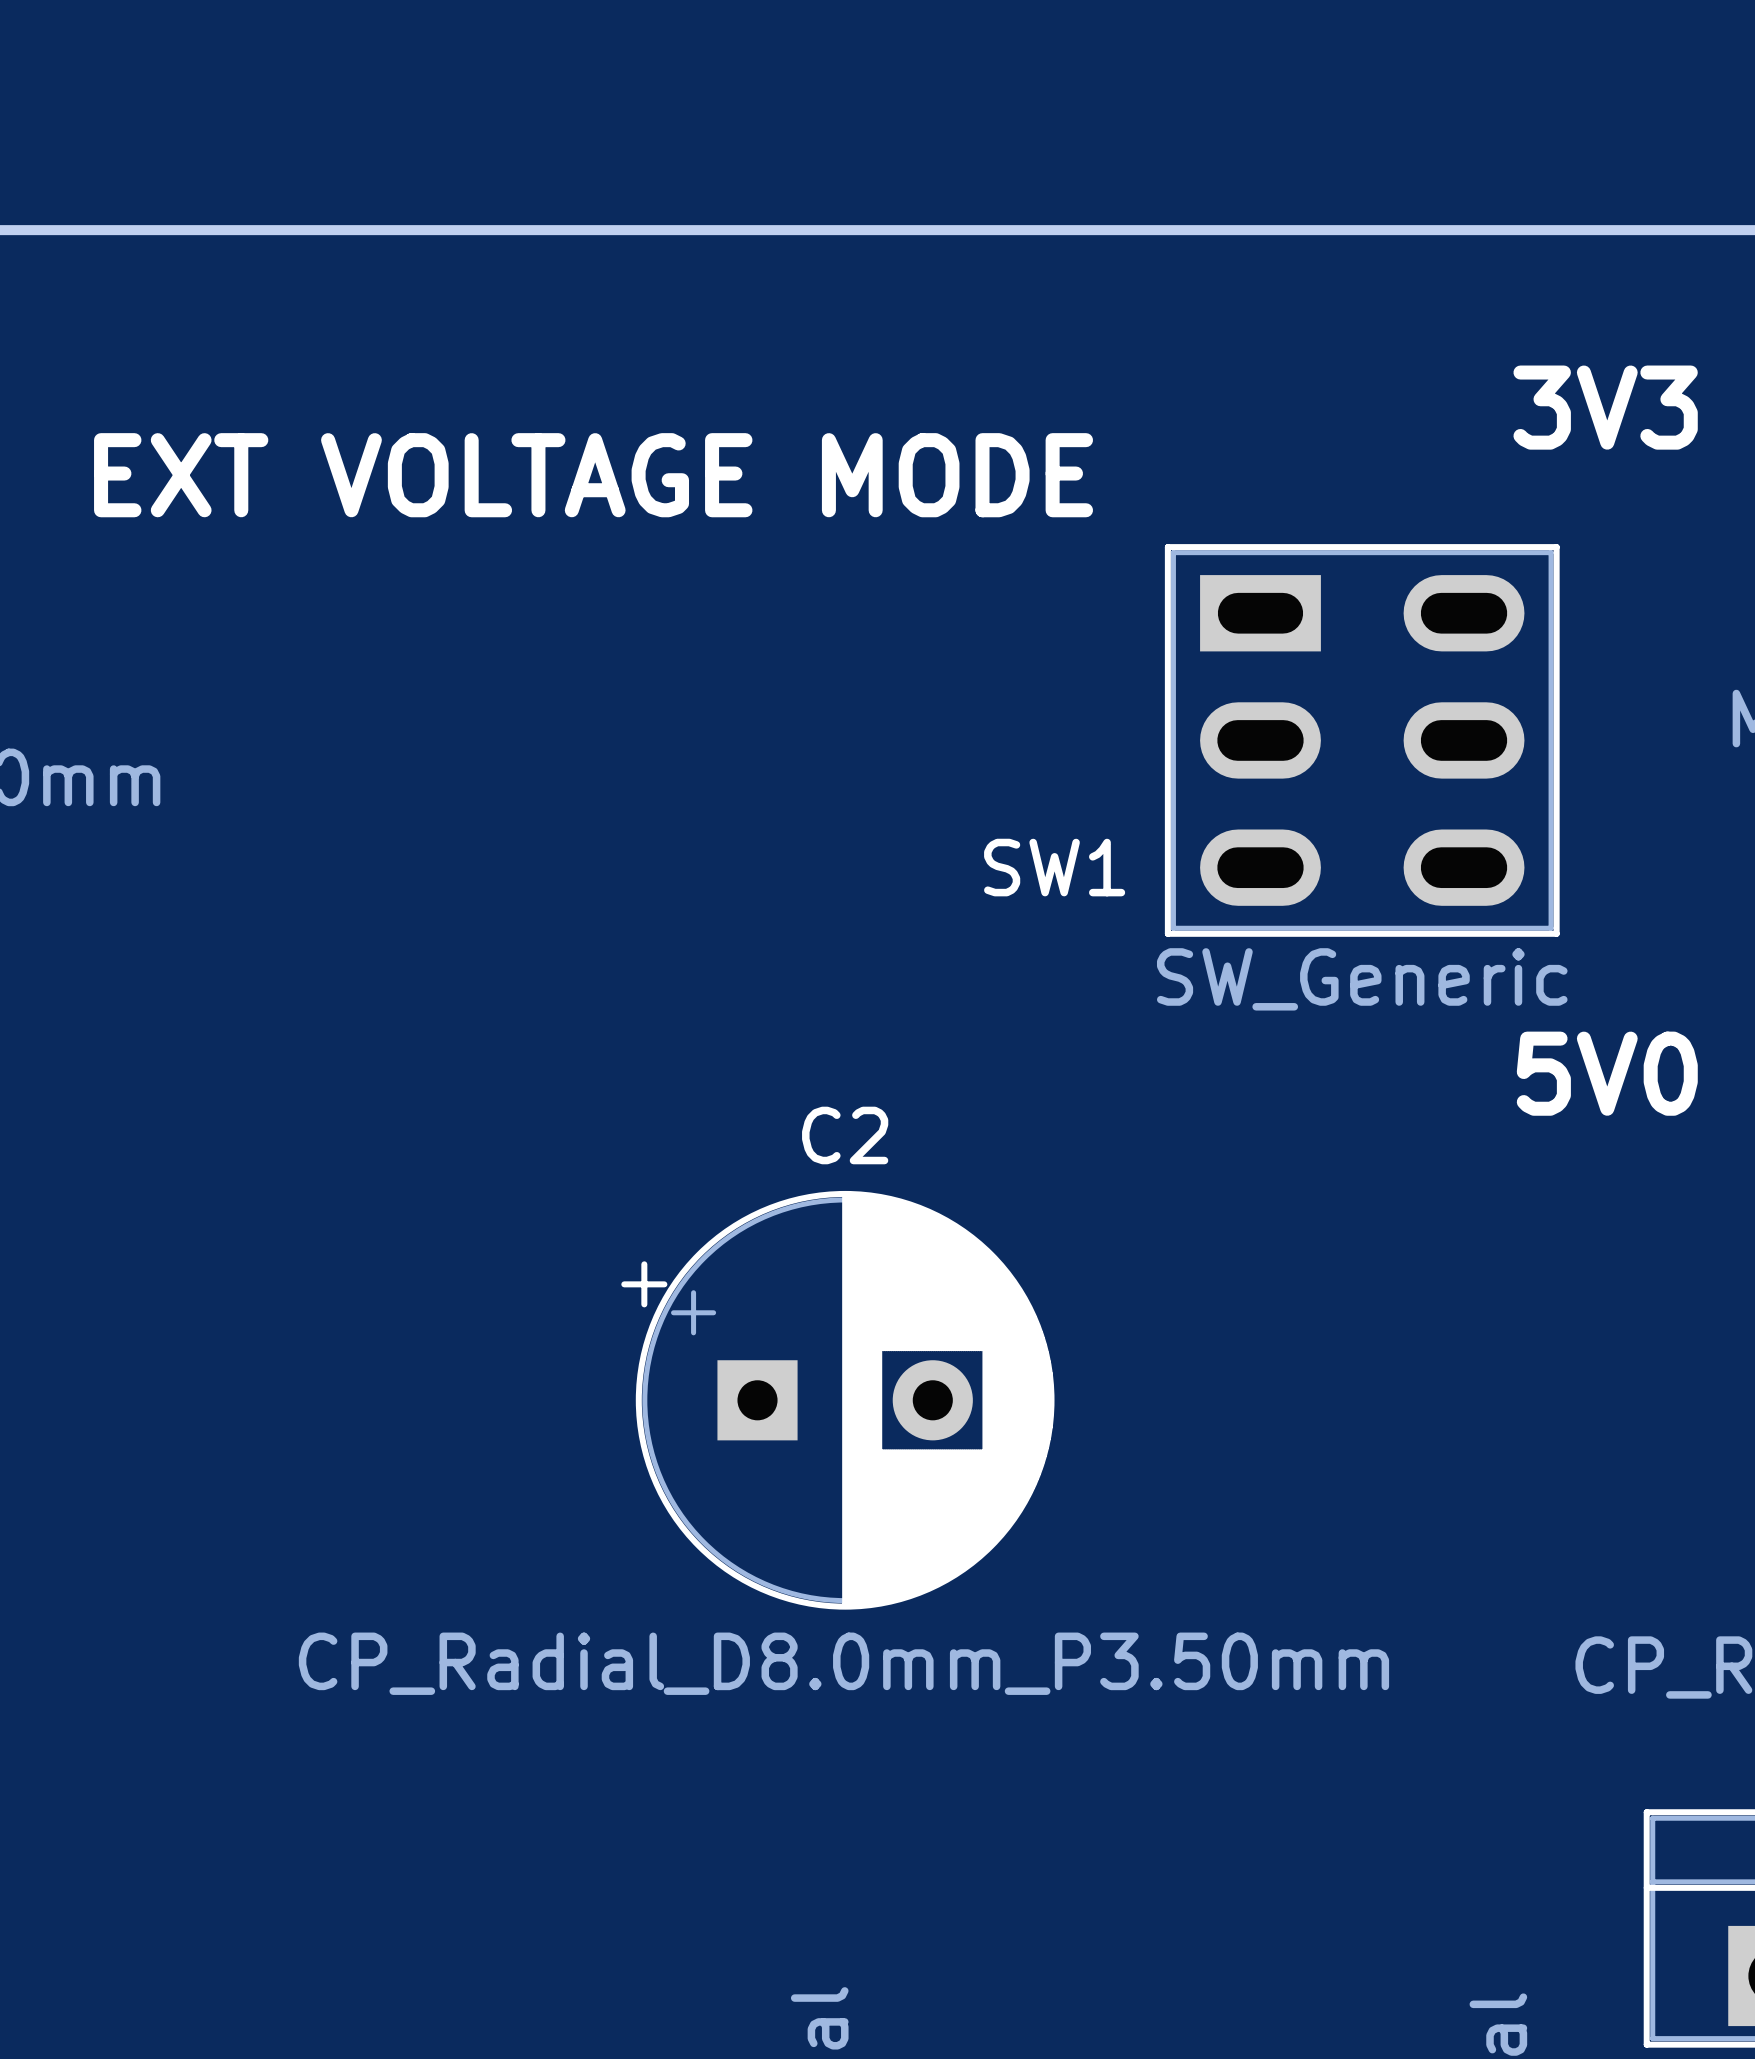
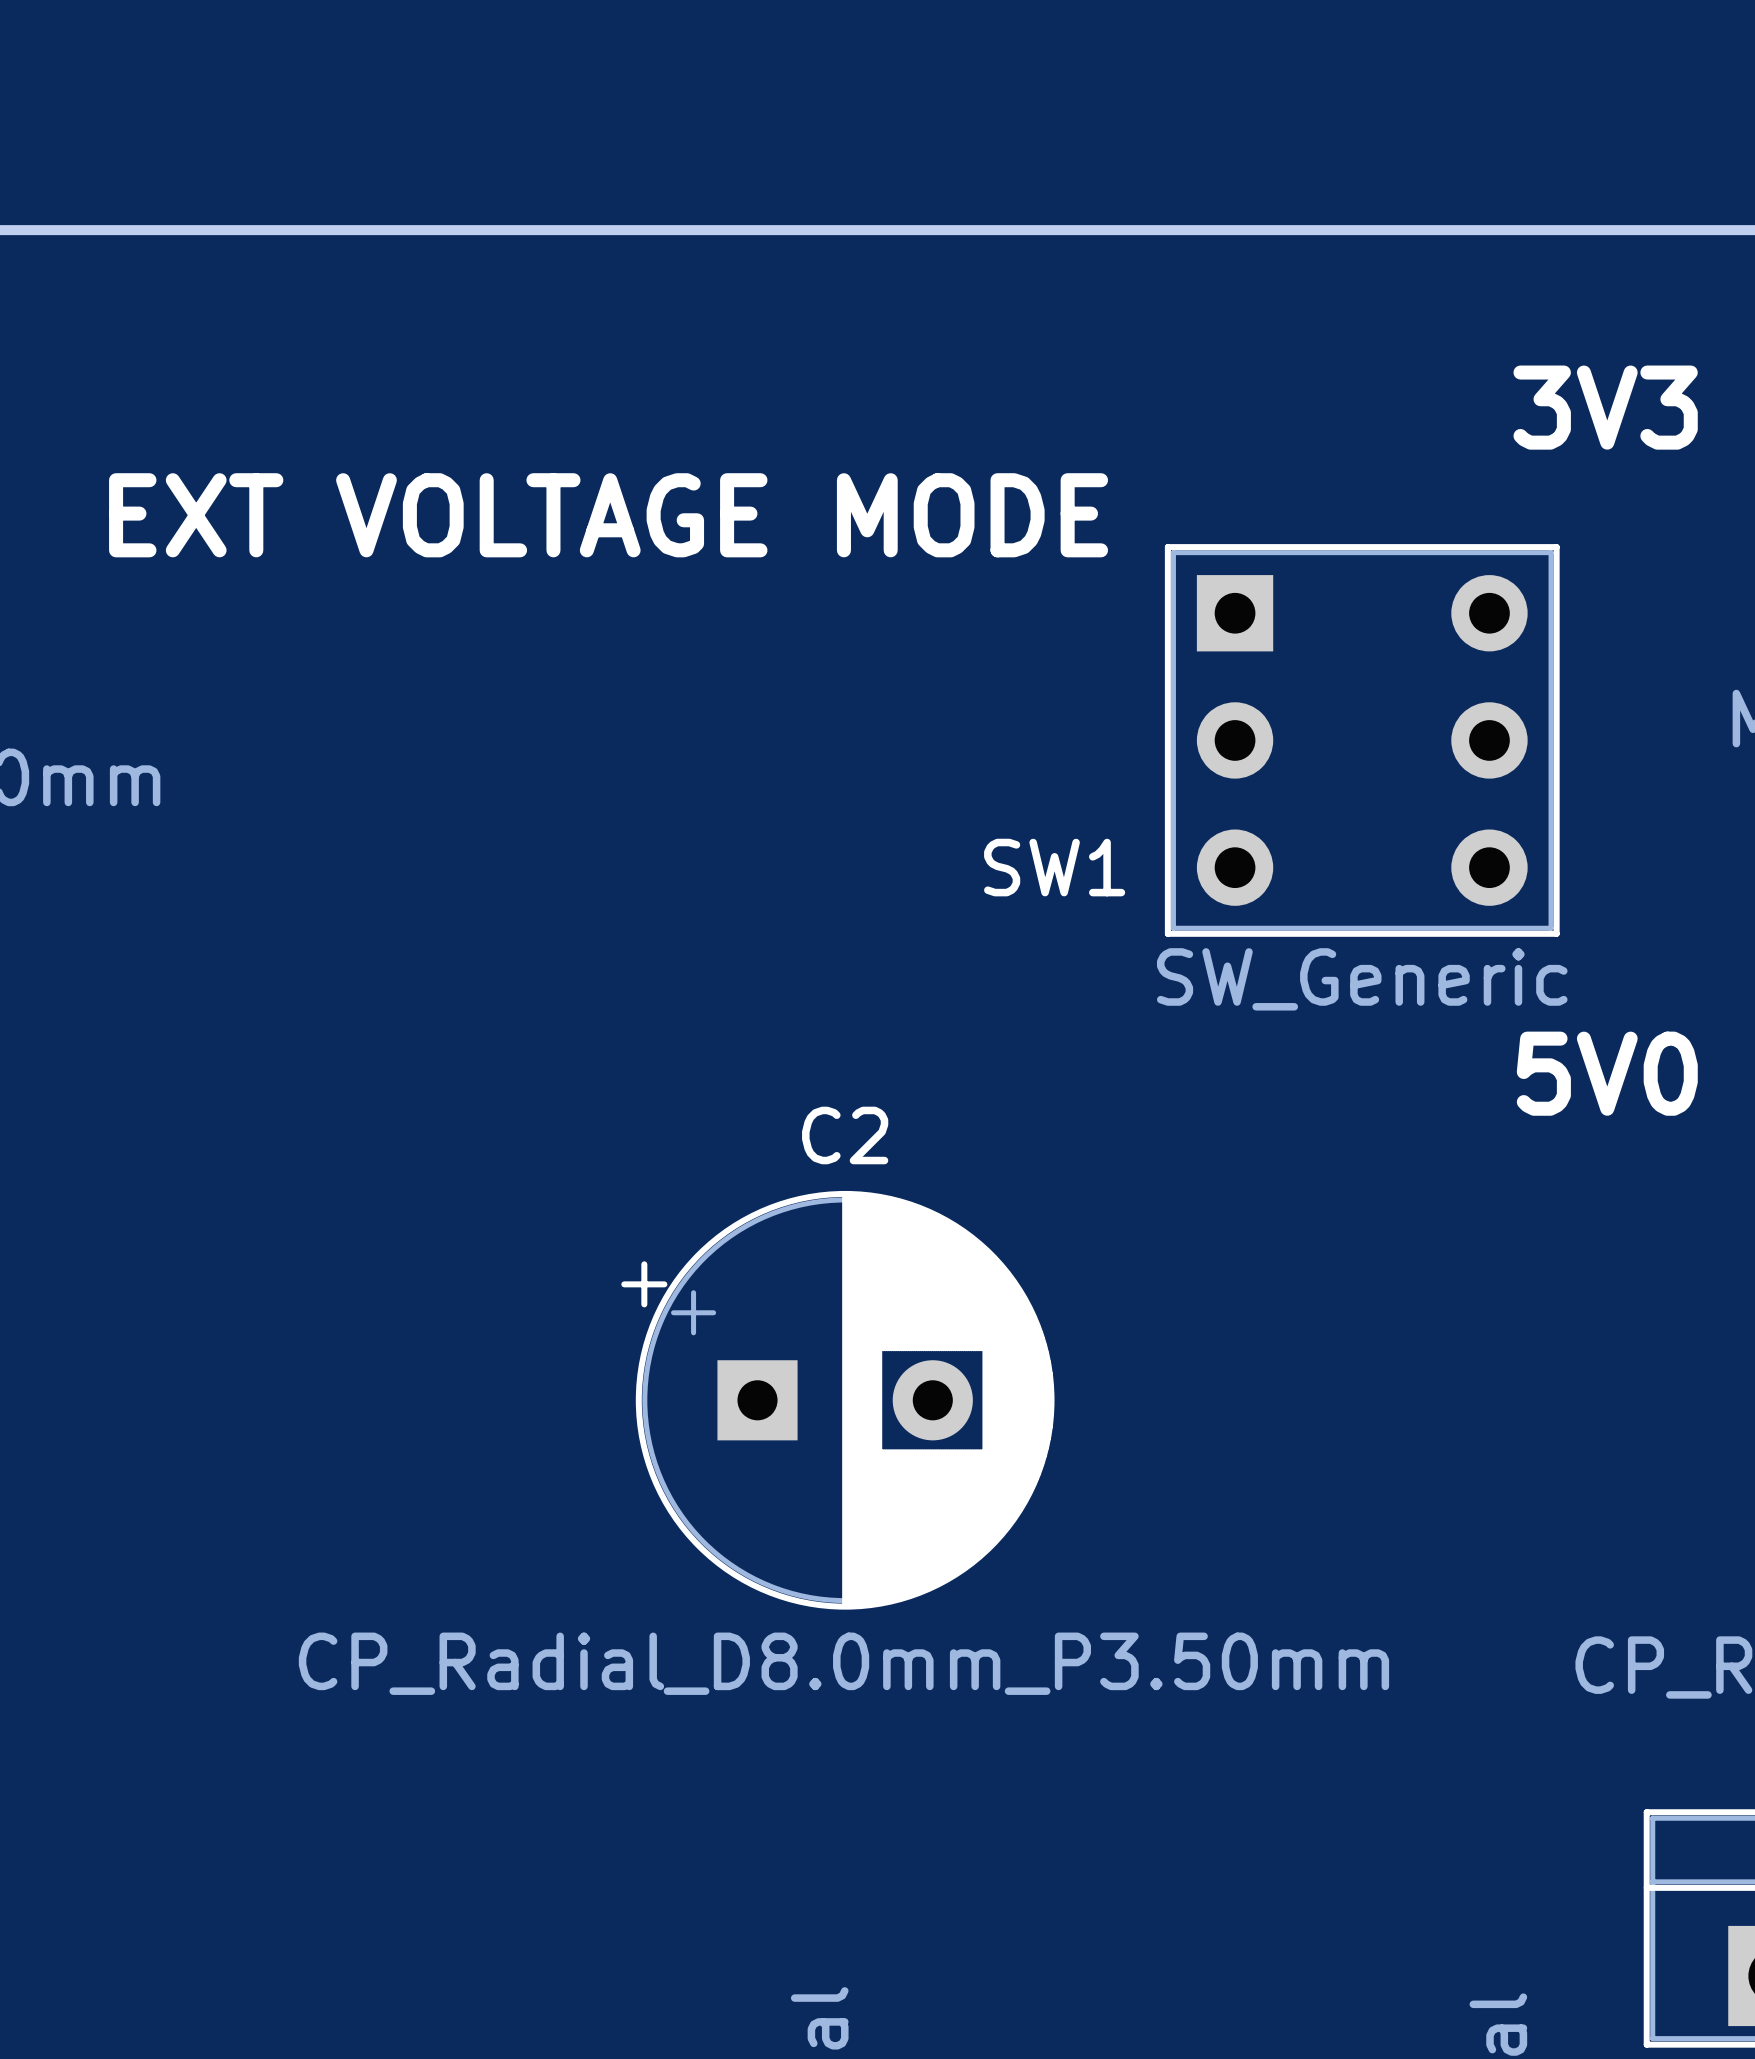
text position: EXT VOLTAGE MODE (593, 475) -> EXT VOLTAGE MODE (608, 515)
SW1 footprint: [1164, 544, 1560, 937] -> [1164, 544, 1560, 937]

